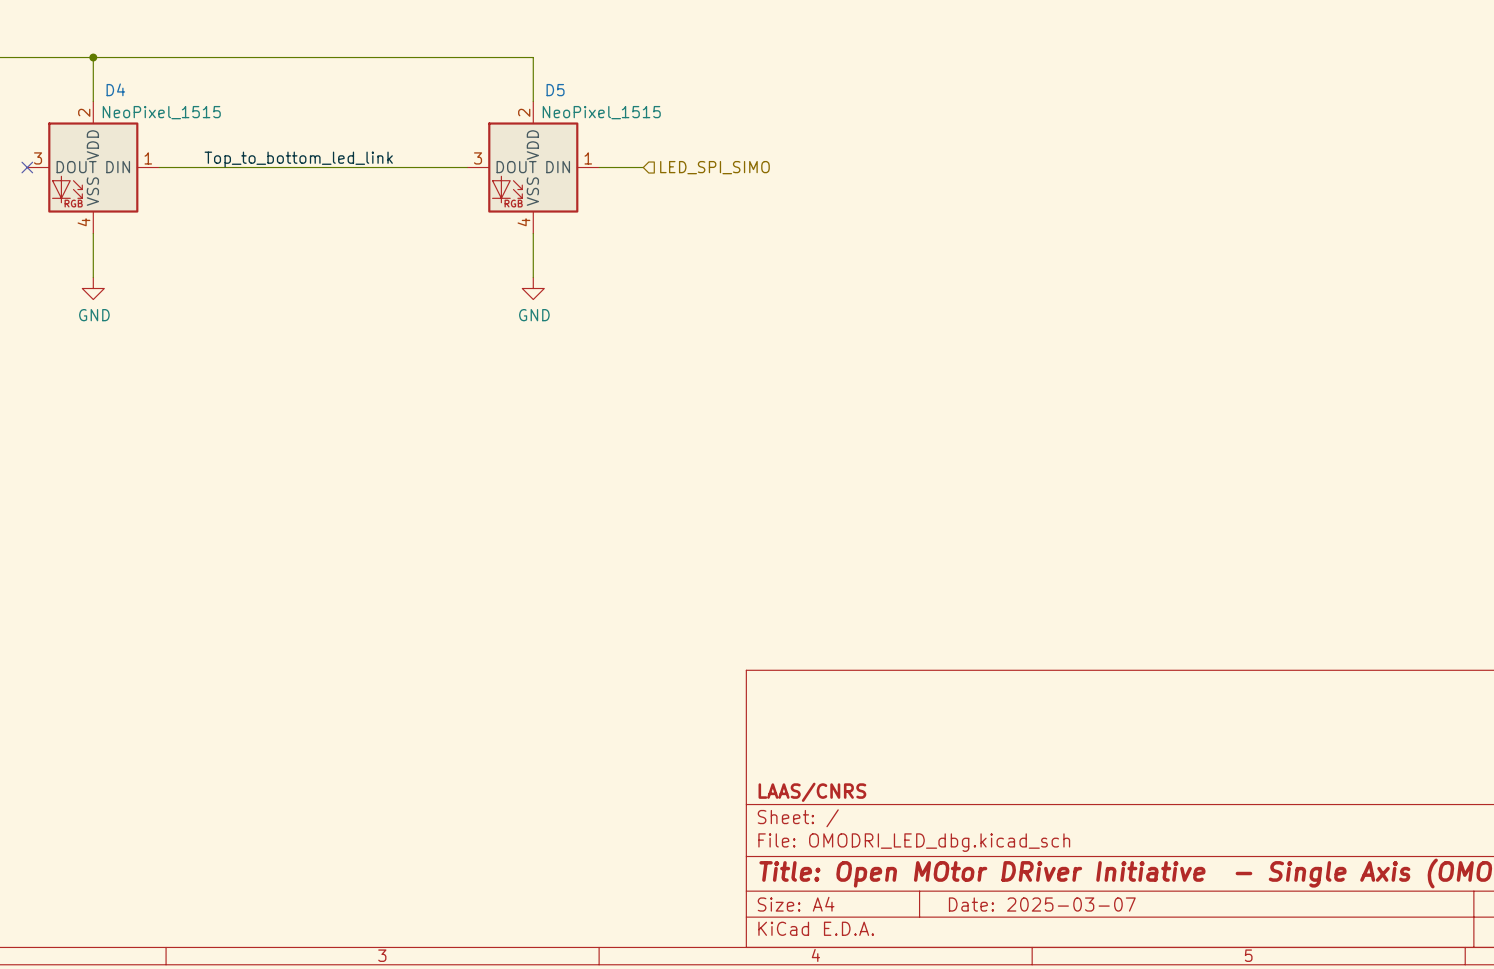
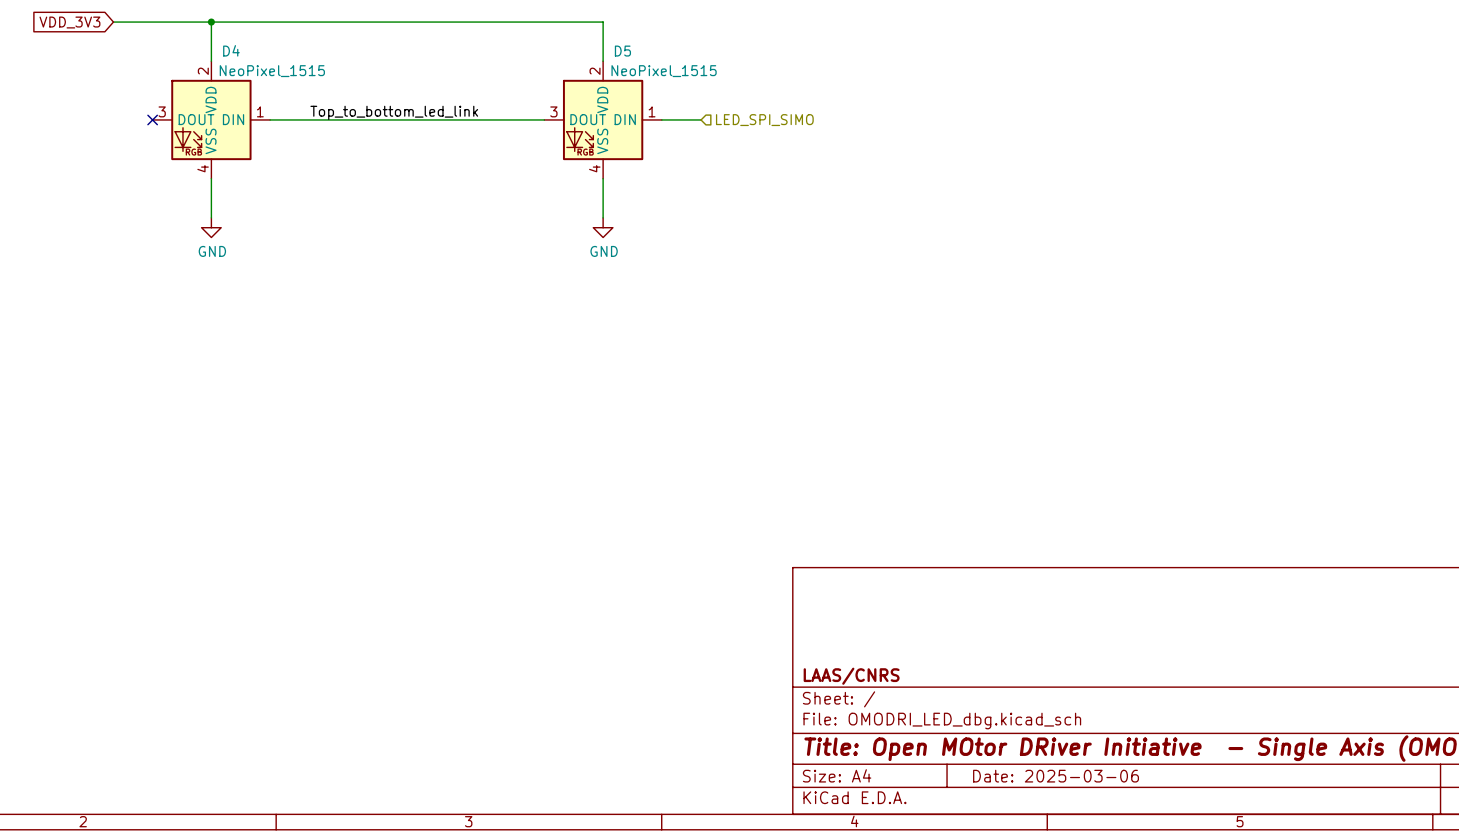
title block: Date: 2025-03-07 (1042, 904) -> Date: 2025-03-06 (1056, 776)

